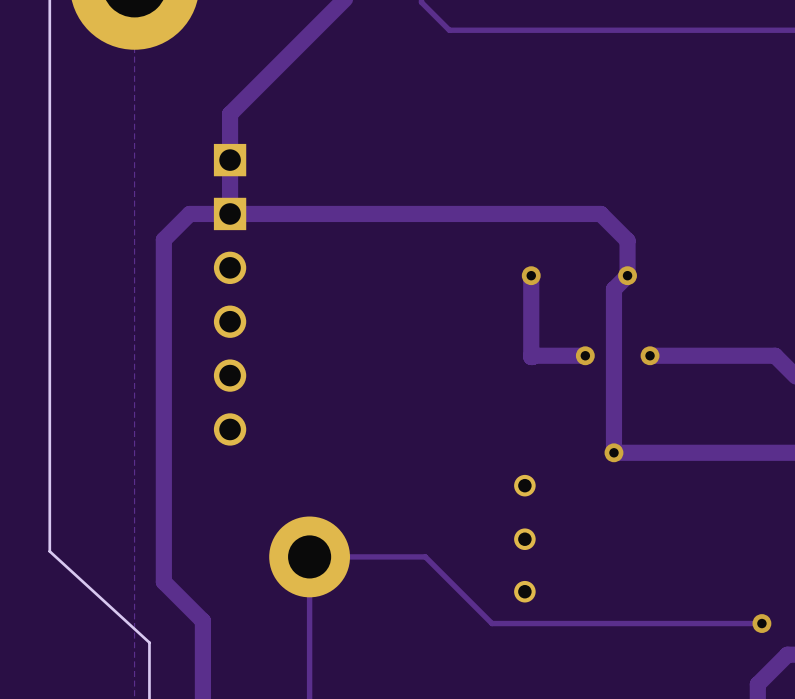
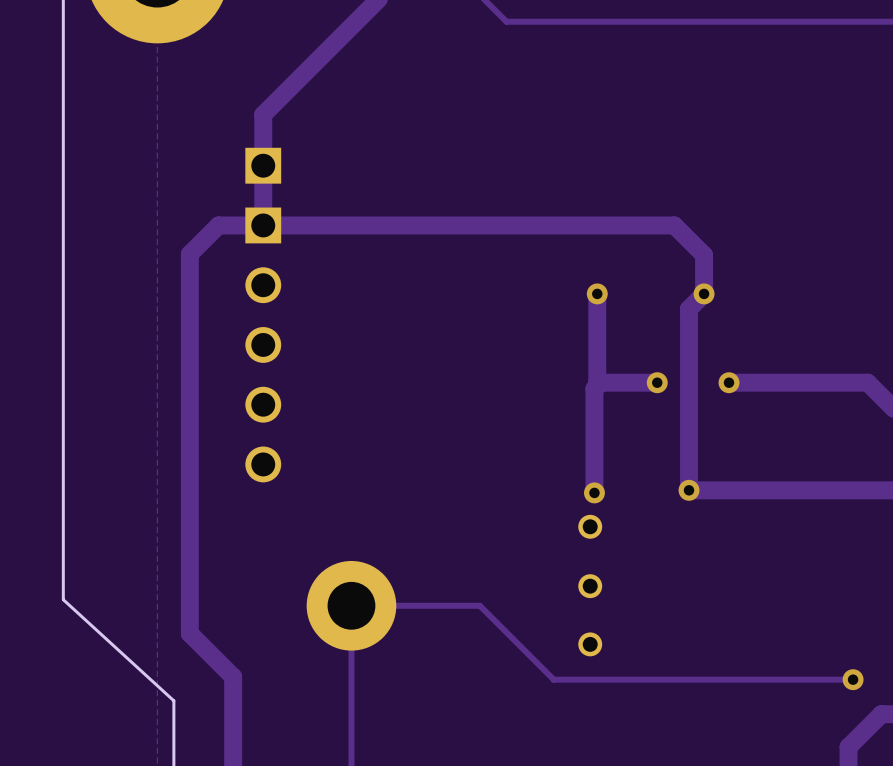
track: none -> (600, 382) (594, 388) (594, 492)
via: none -> (594, 492)

